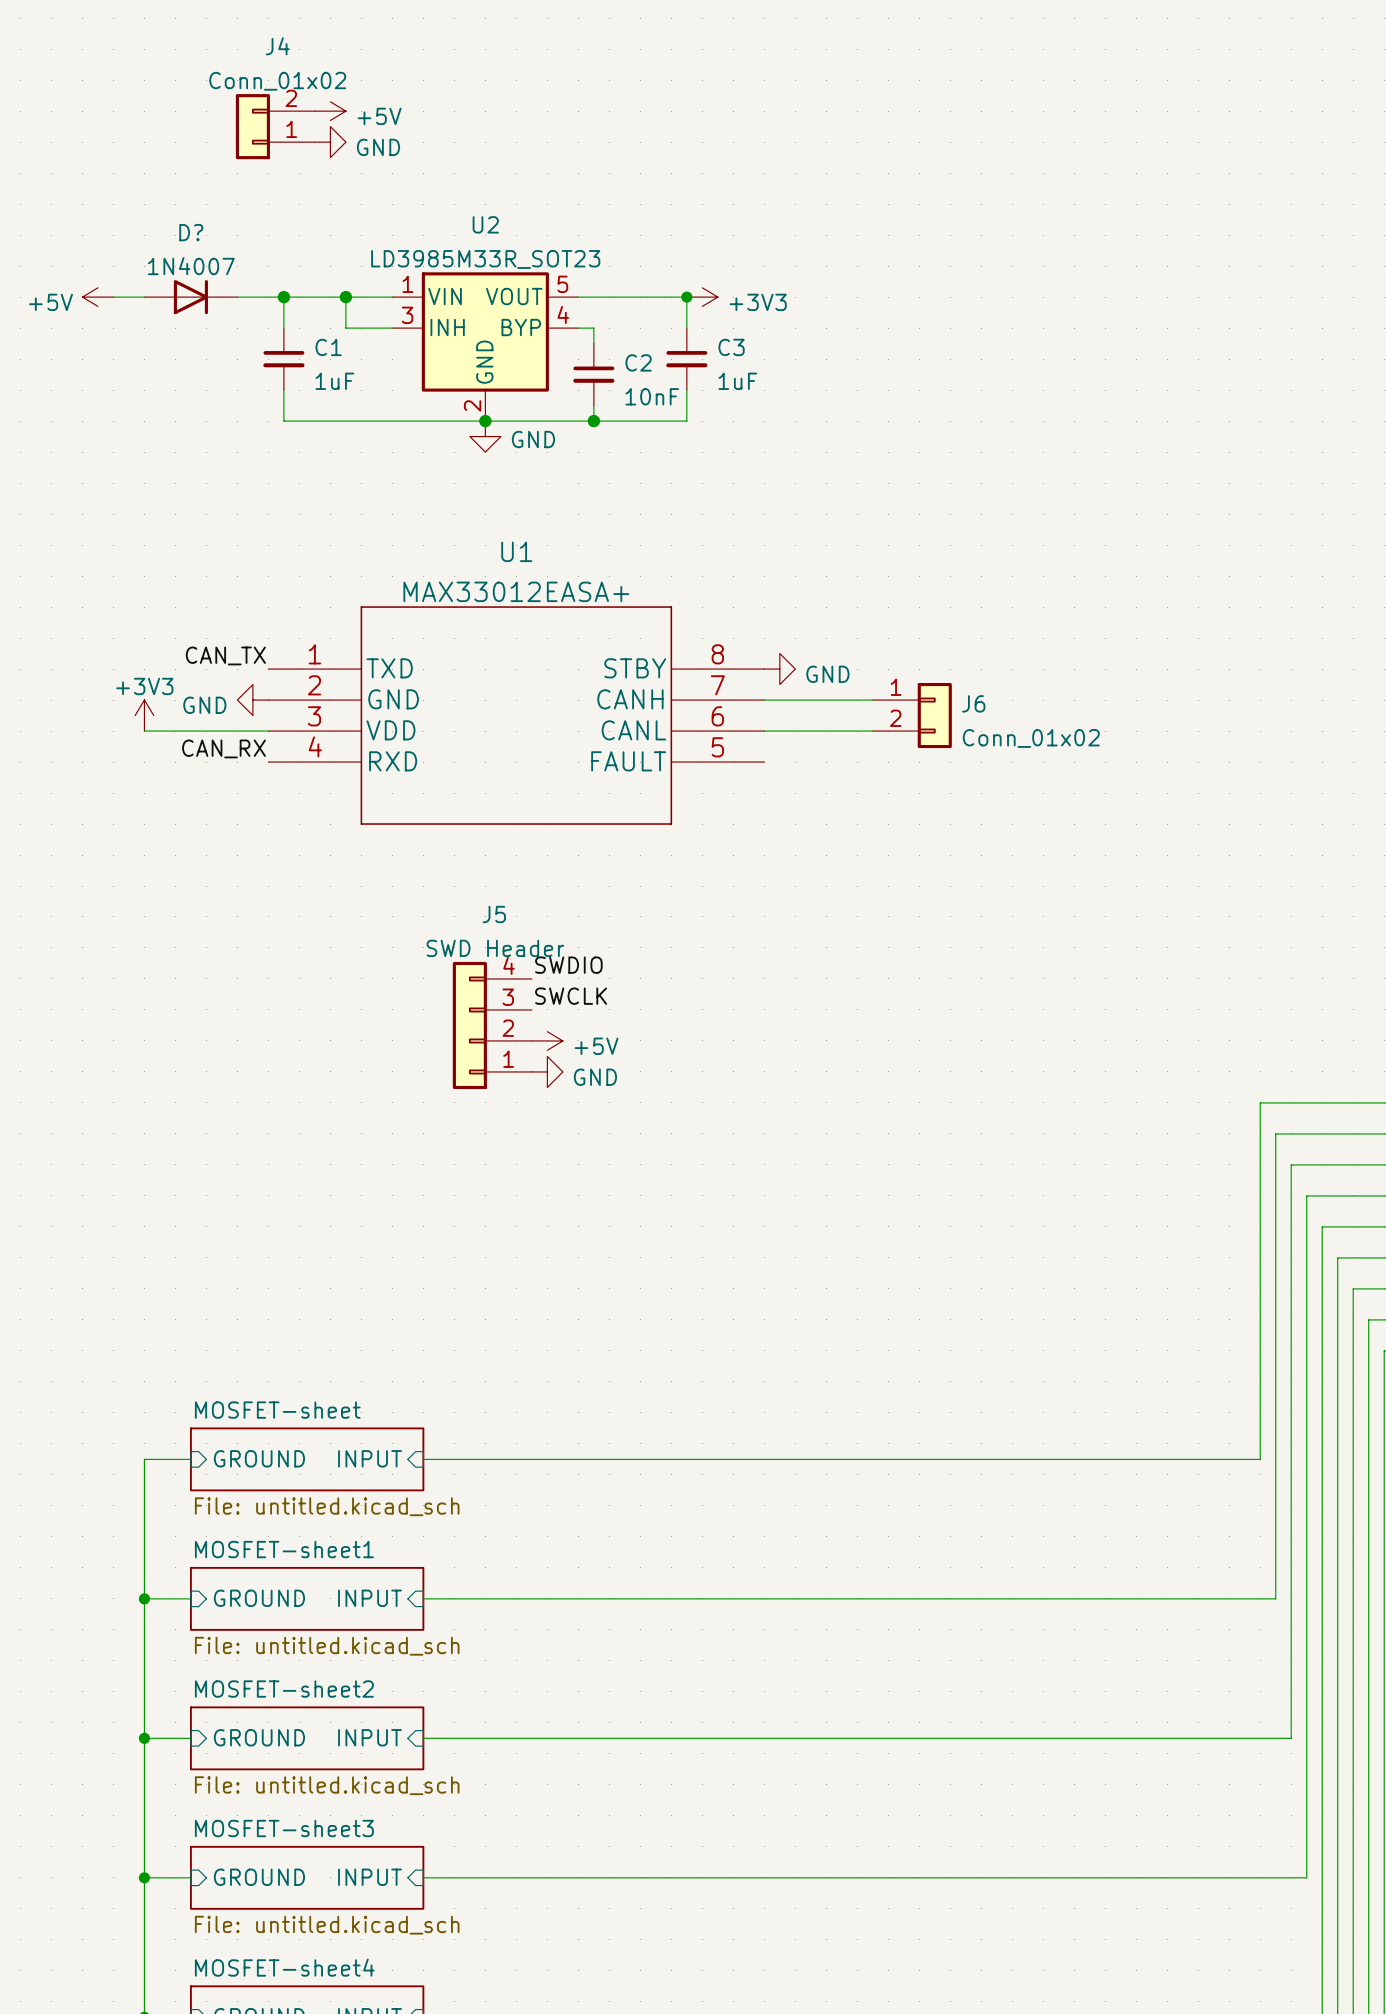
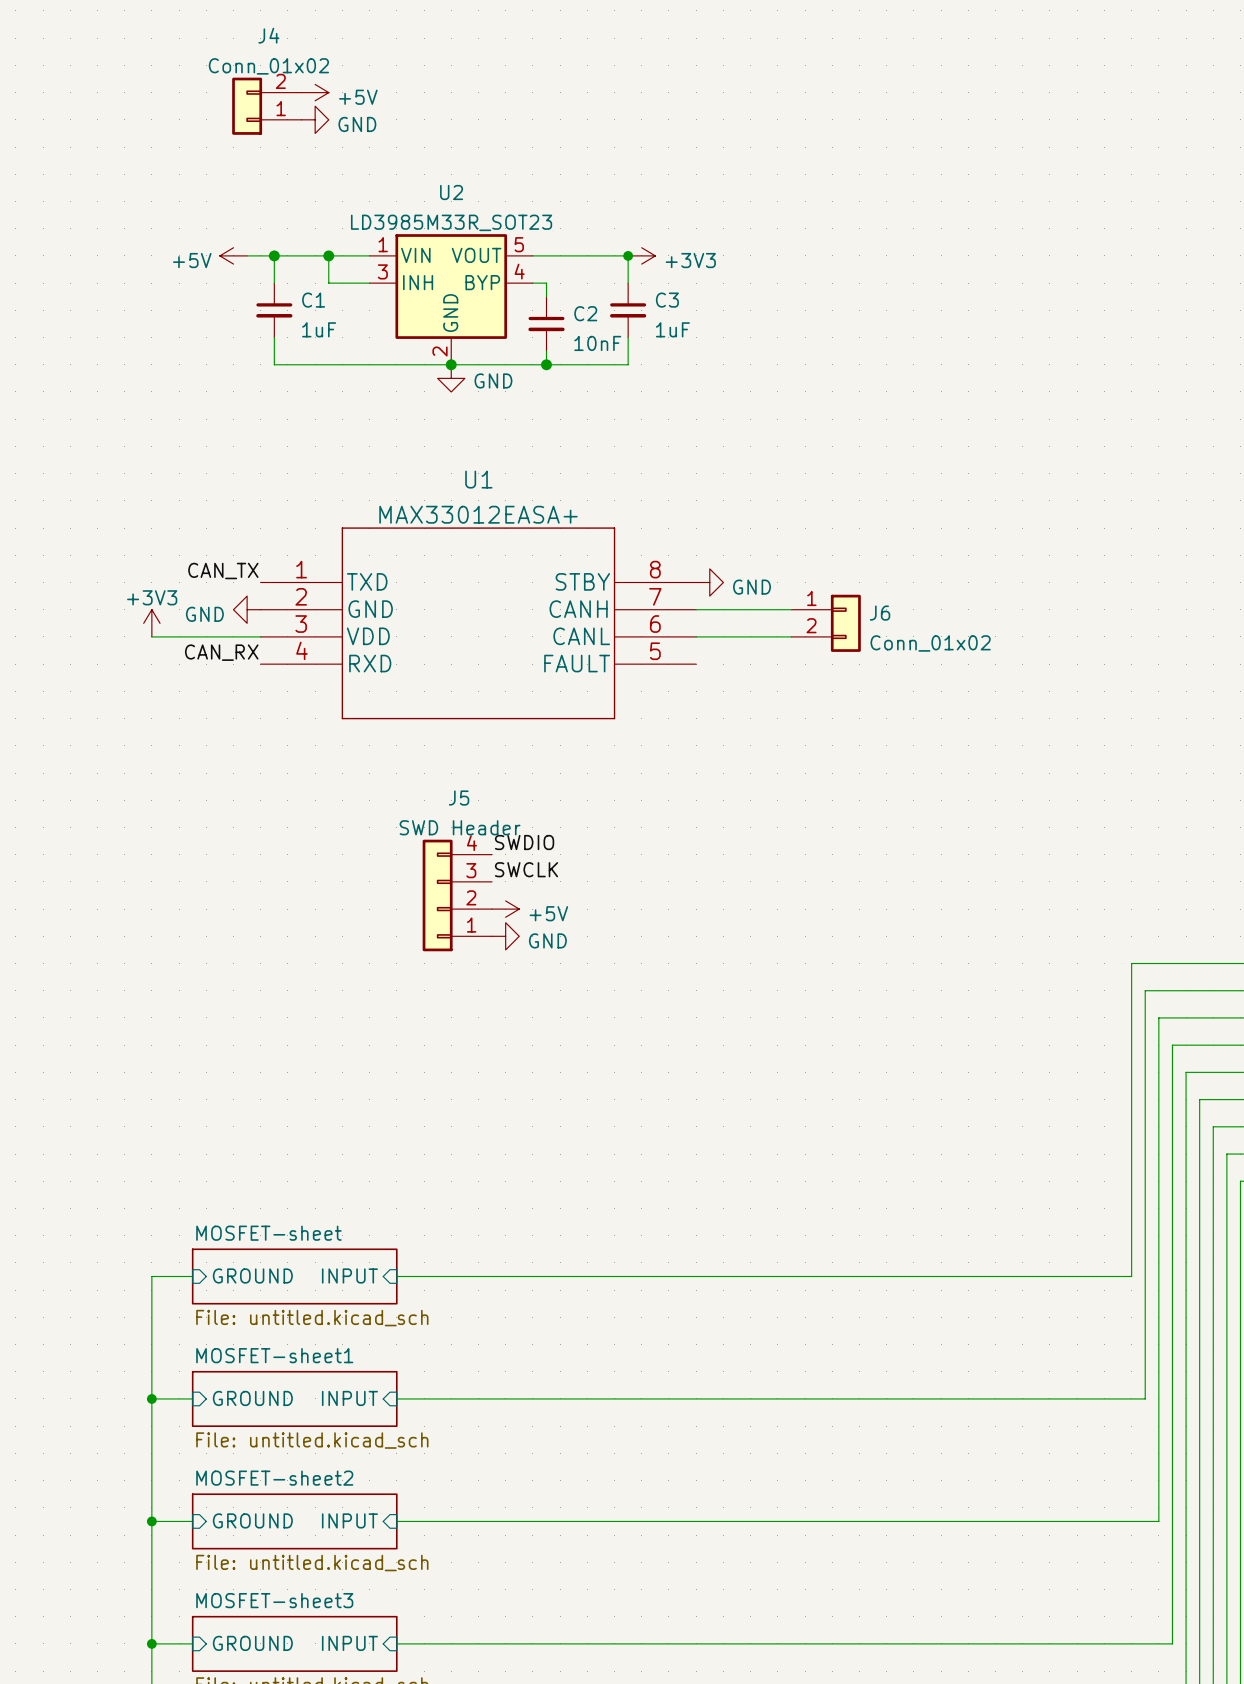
power symbol position: +5V (97, 297) -> +5V (233, 255)
wire: (113, 297) (144, 297) -> none
D?: 1N4007 (190, 297) -> none

